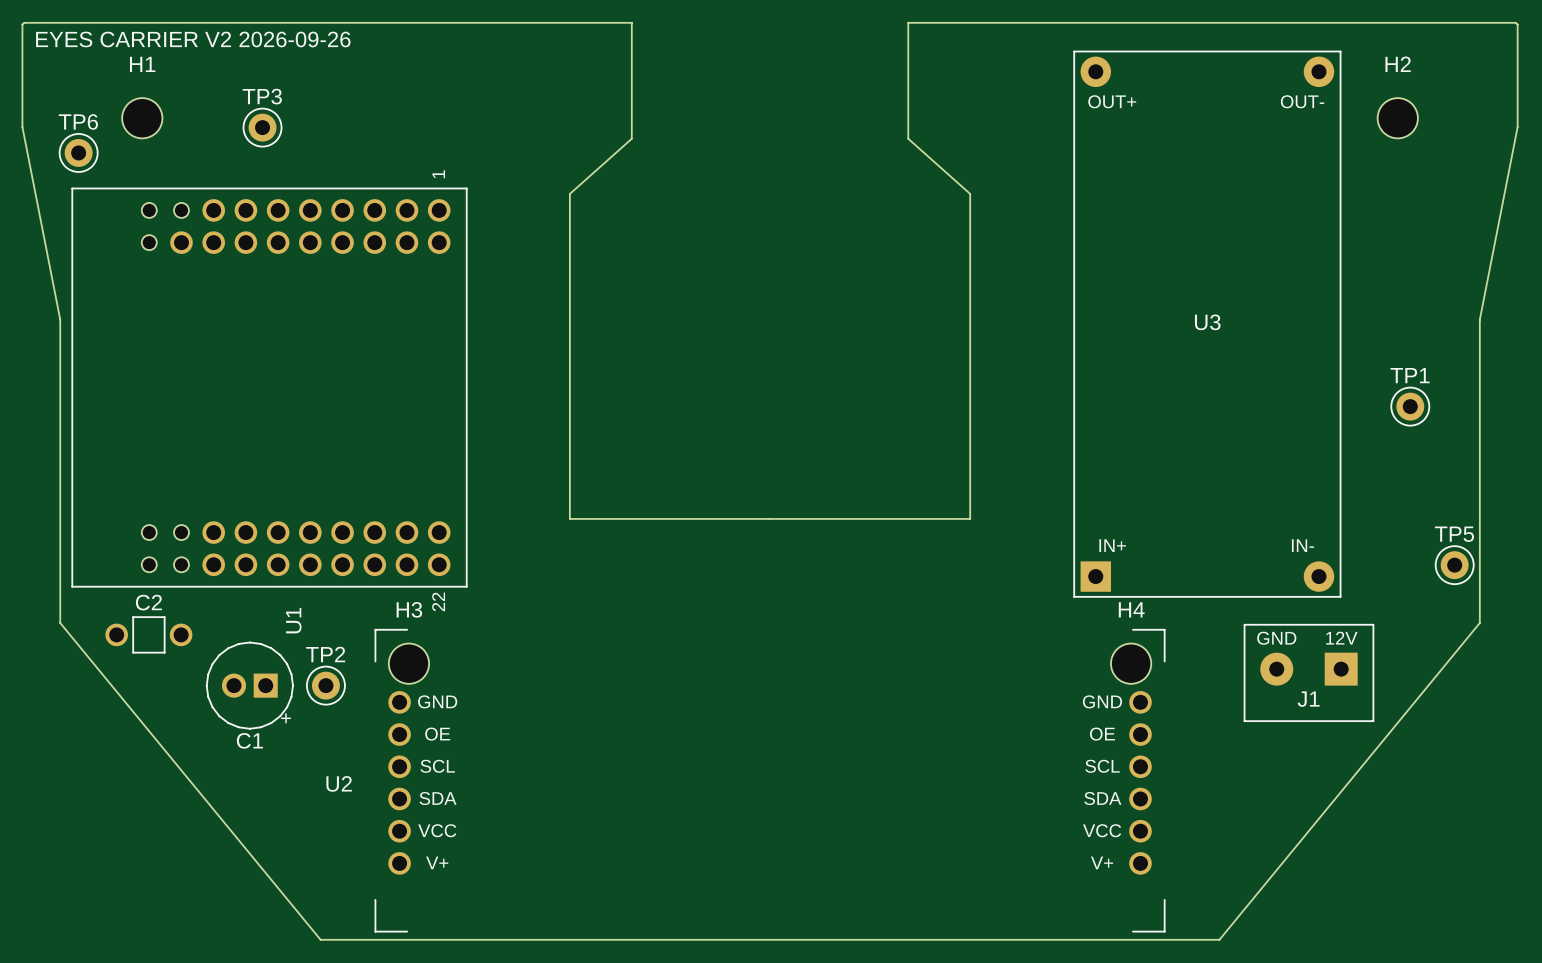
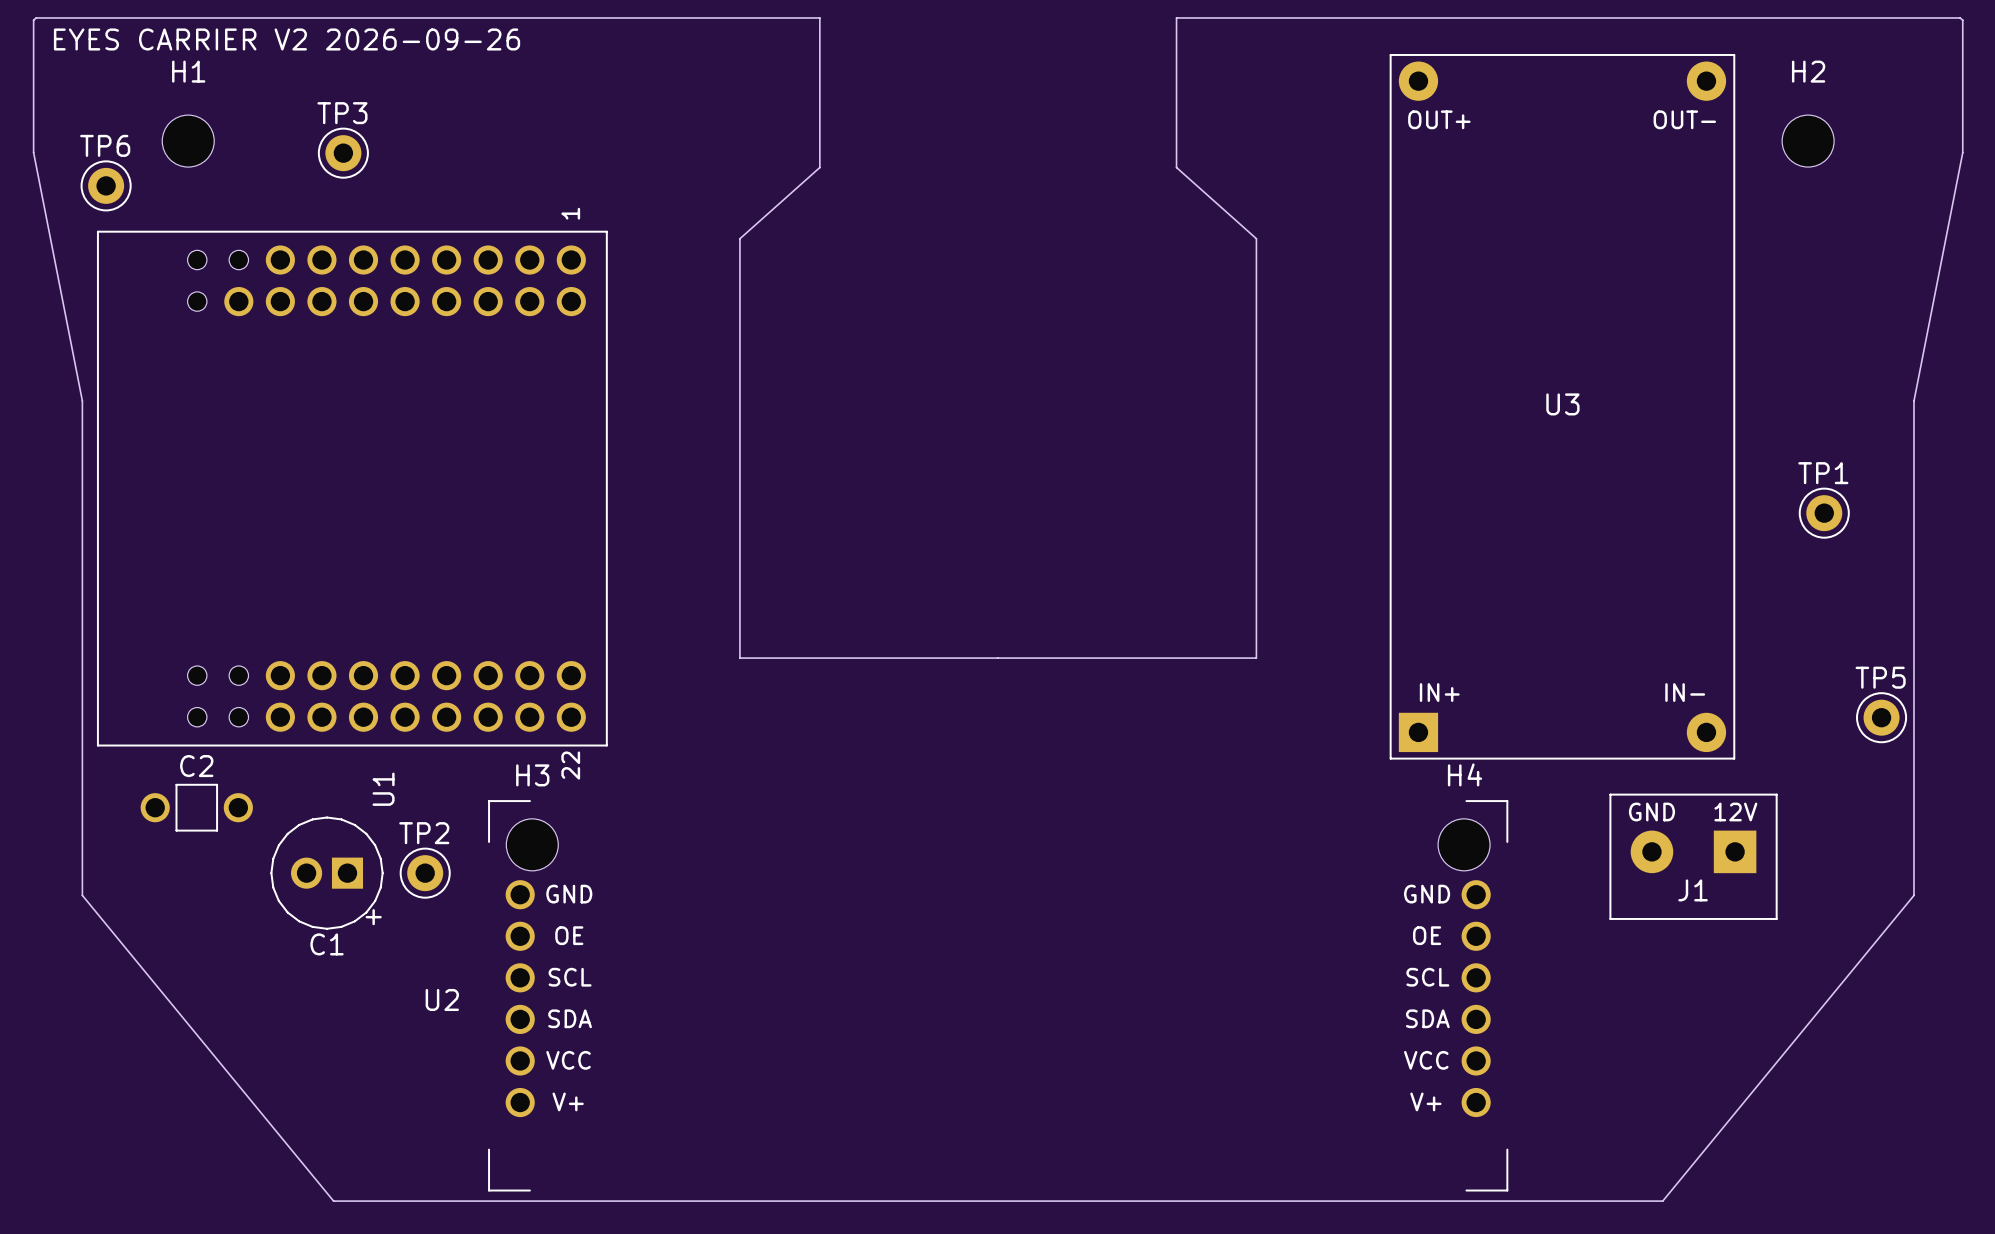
board edge: (60, 622) (320, 939) -> (82, 792) (82, 895) (333, 1201) (418, 1201)
board edge: (1479, 622) (1219, 939) -> (1913, 792) (1913, 895) (1662, 1201) (1578, 1201)

